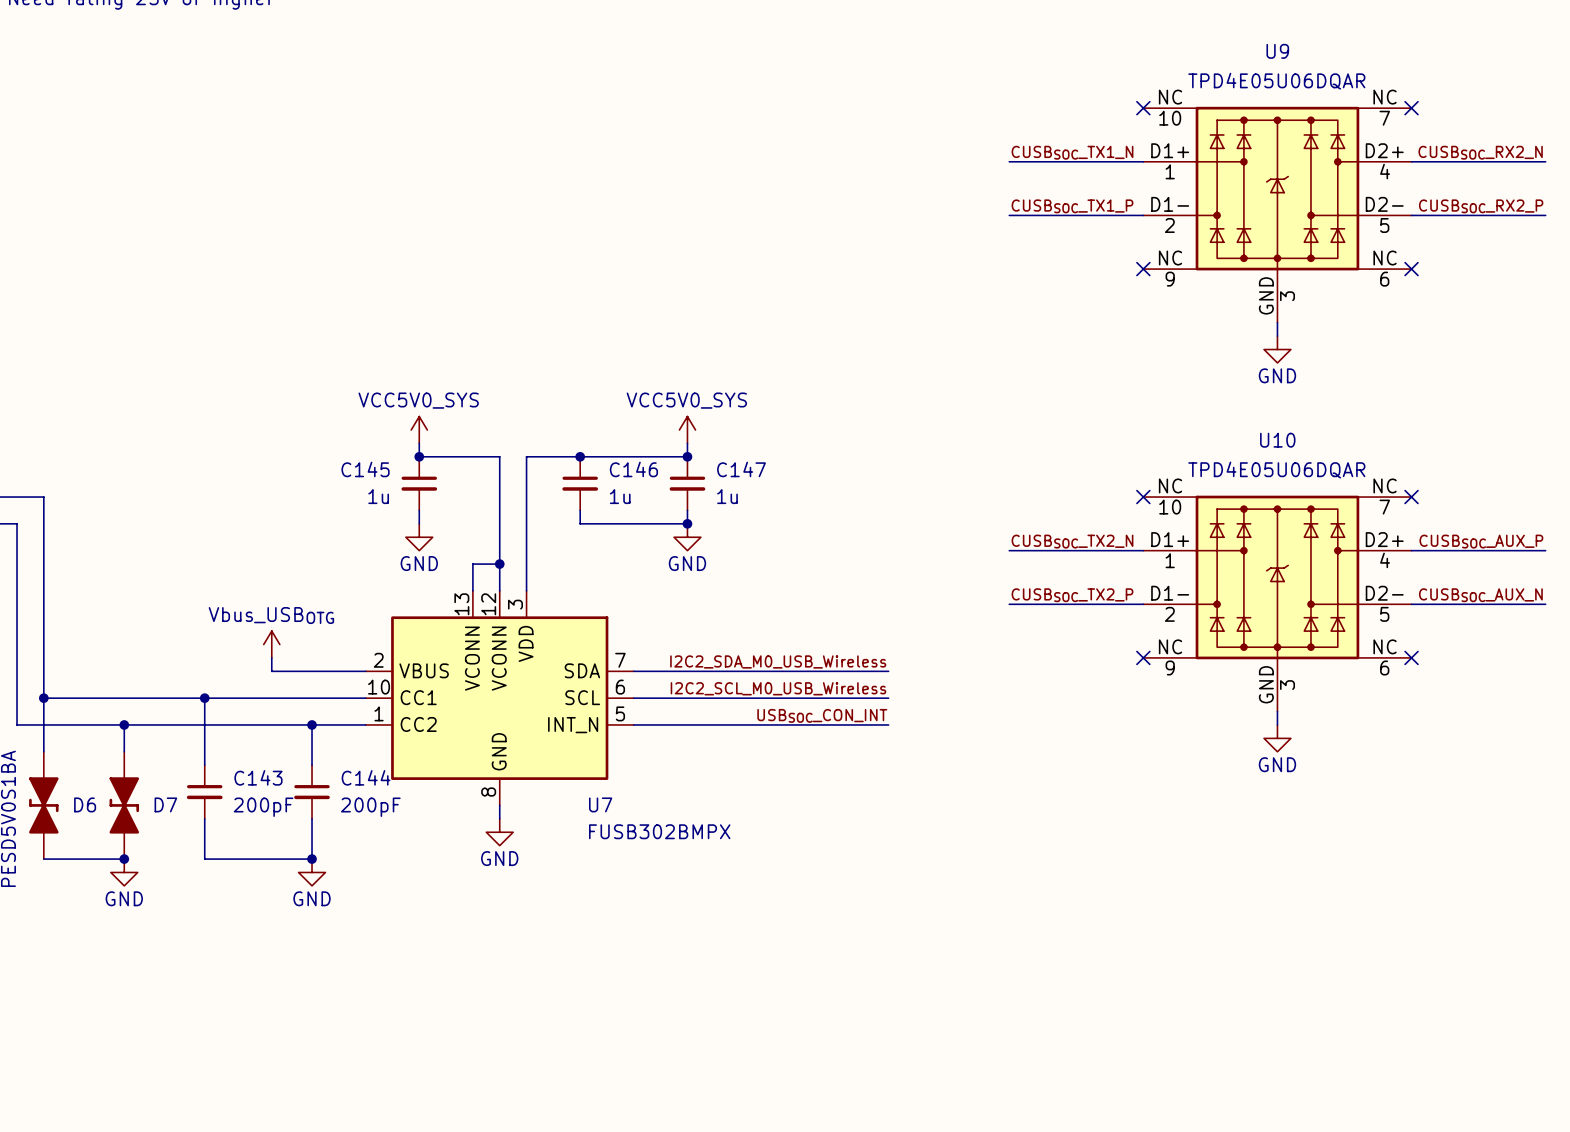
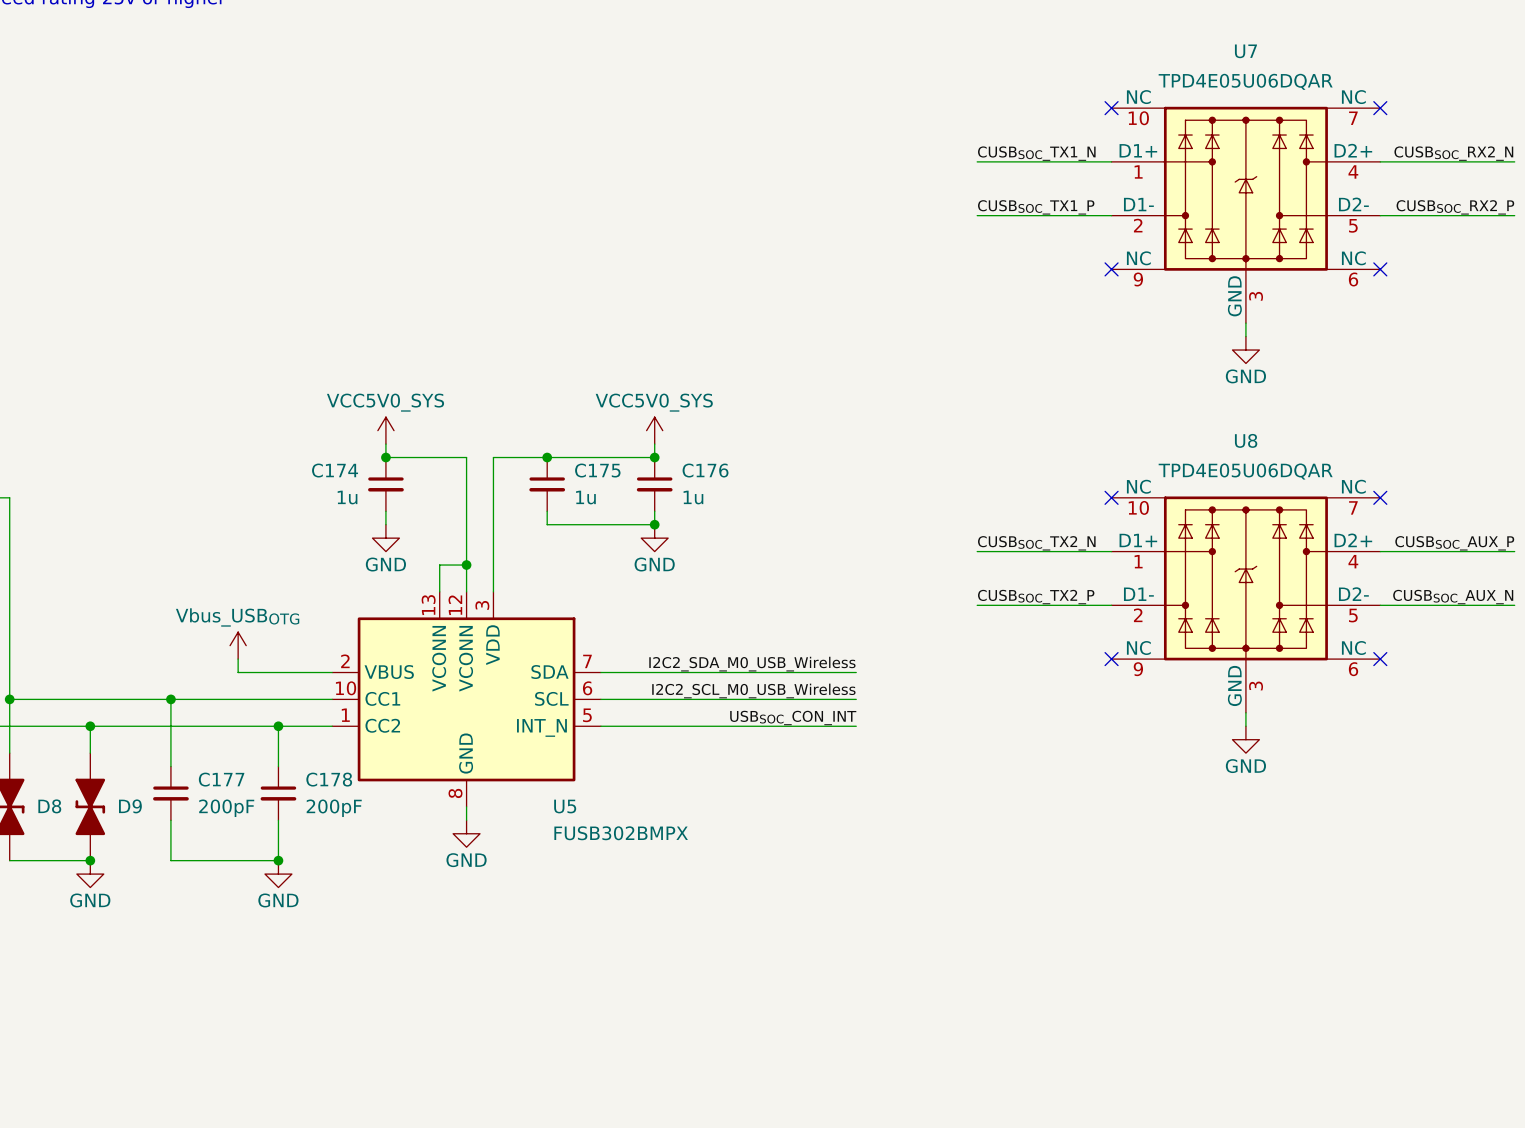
U9 name: U9 (1277, 51) -> U7 (1245, 51)
U10 name: U10 (1277, 440) -> U8 (1246, 440)
C145 name: C145 (365, 469) -> C174 (335, 470)
C146 name: C146 (633, 469) -> C175 (597, 470)
C147 name: C147 (741, 469) -> C176 (705, 470)
C143 name: C143 (258, 777) -> C177 (221, 779)
C144 name: C144 (366, 777) -> C178 (329, 779)
D6 name: D6 (85, 804) -> D8 (49, 806)
D7 name: D7 (165, 804) -> D9 (130, 806)
U7 name: U7 (600, 804) -> U5 (565, 806)

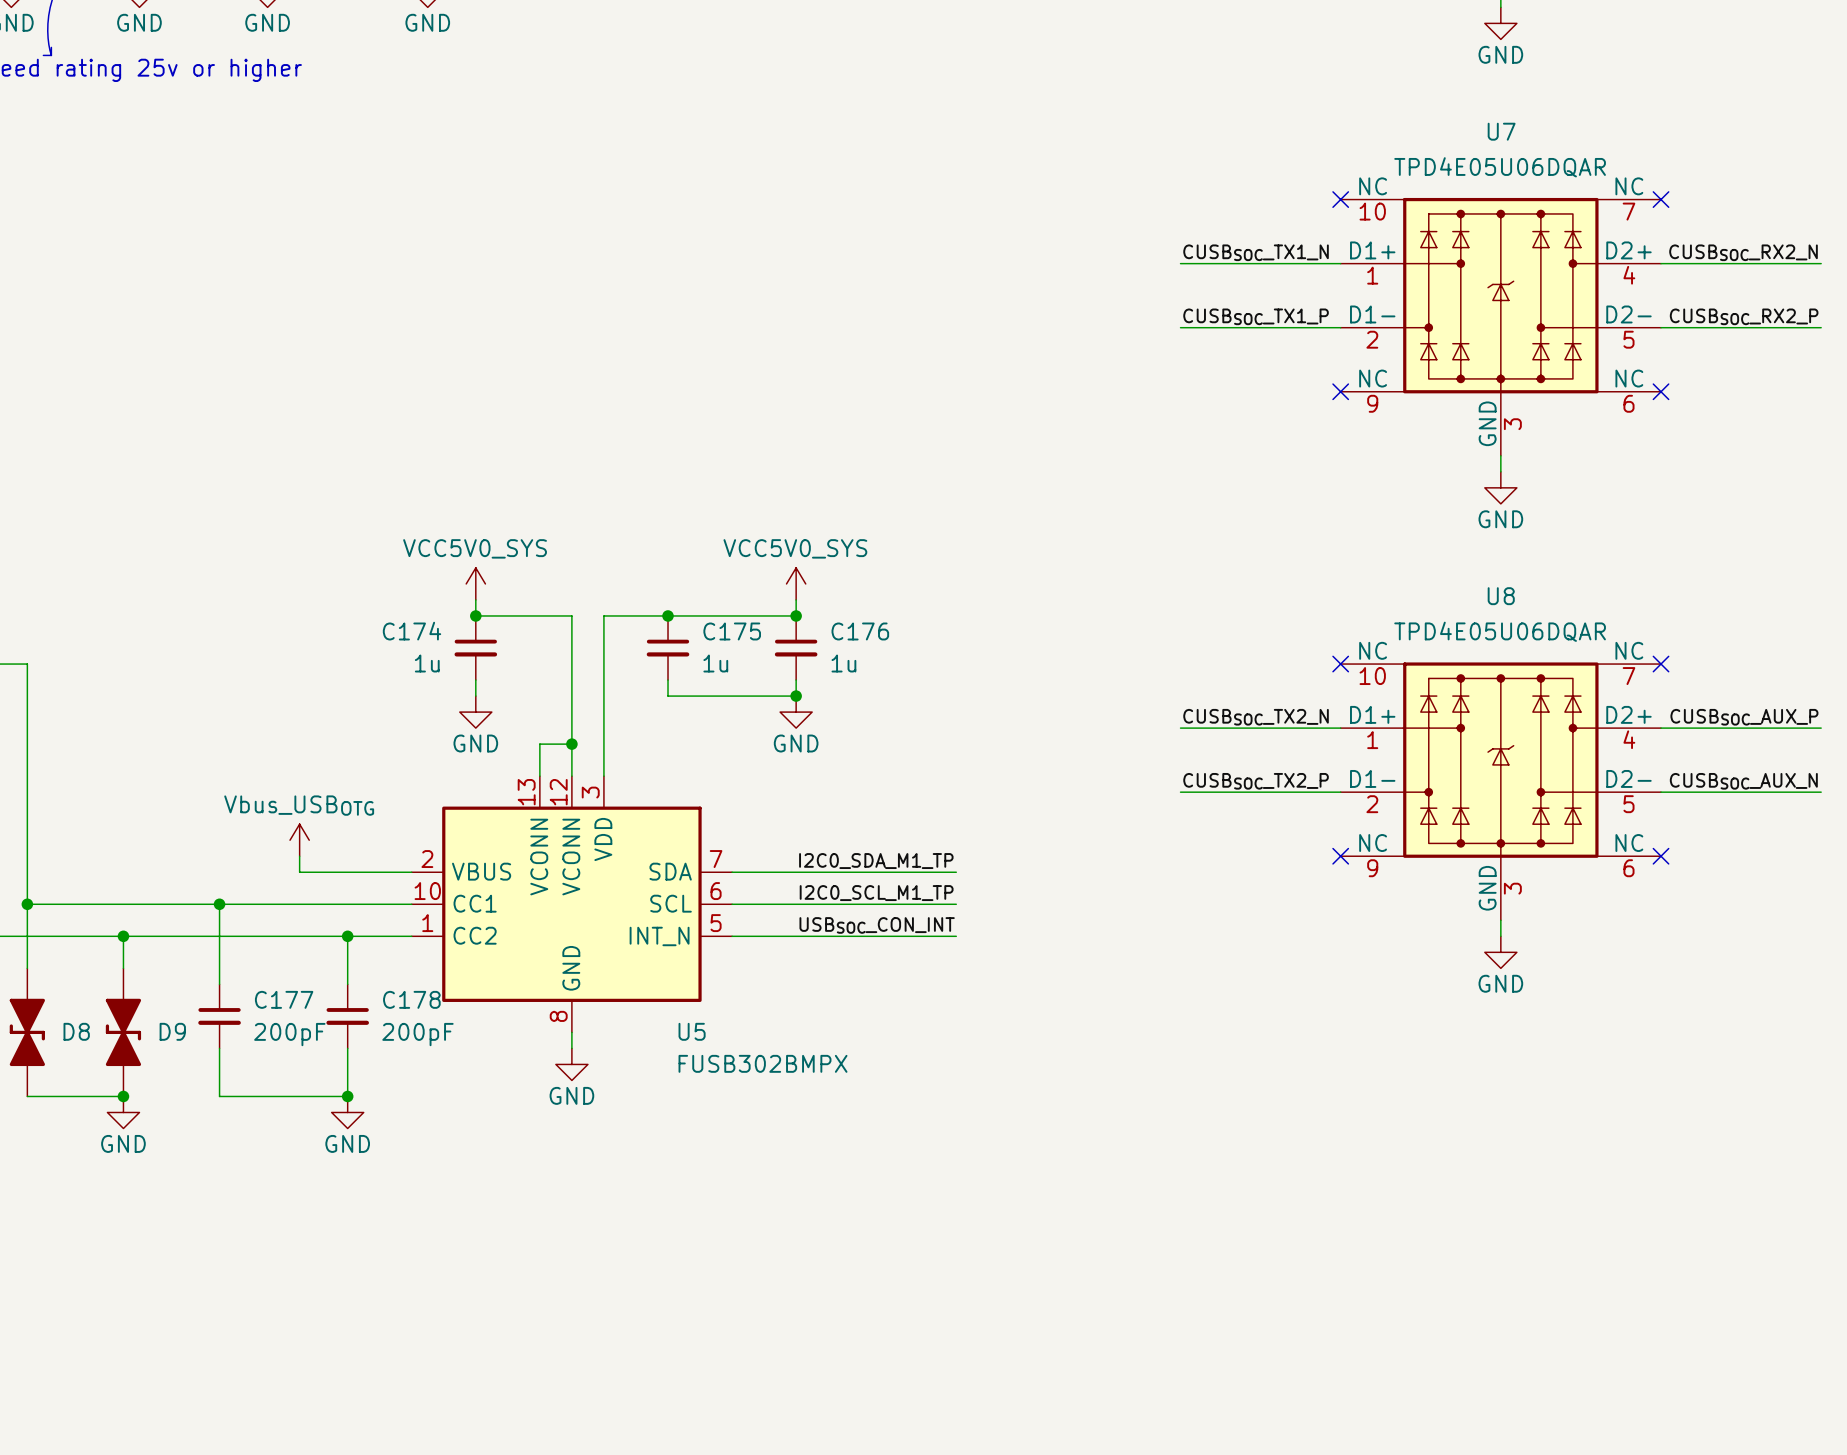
label: none -> I2C0_SDA_M1_TP (876, 861)
label: I2C2_SDA_M0_USB_Wireless (752, 664) -> none
wire: (789, 672) (856, 672) -> none
label: I2C2_SCL_M0_USB_Wireless (753, 690) -> none
label: none -> I2C0_SCL_M1_TP (876, 893)
wire: (789, 699) (856, 699) -> none
label position: USBSOC_CON_INT (793, 717) -> USBSOC_CON_INT (877, 925)
wire: (789, 726) (856, 726) -> none

